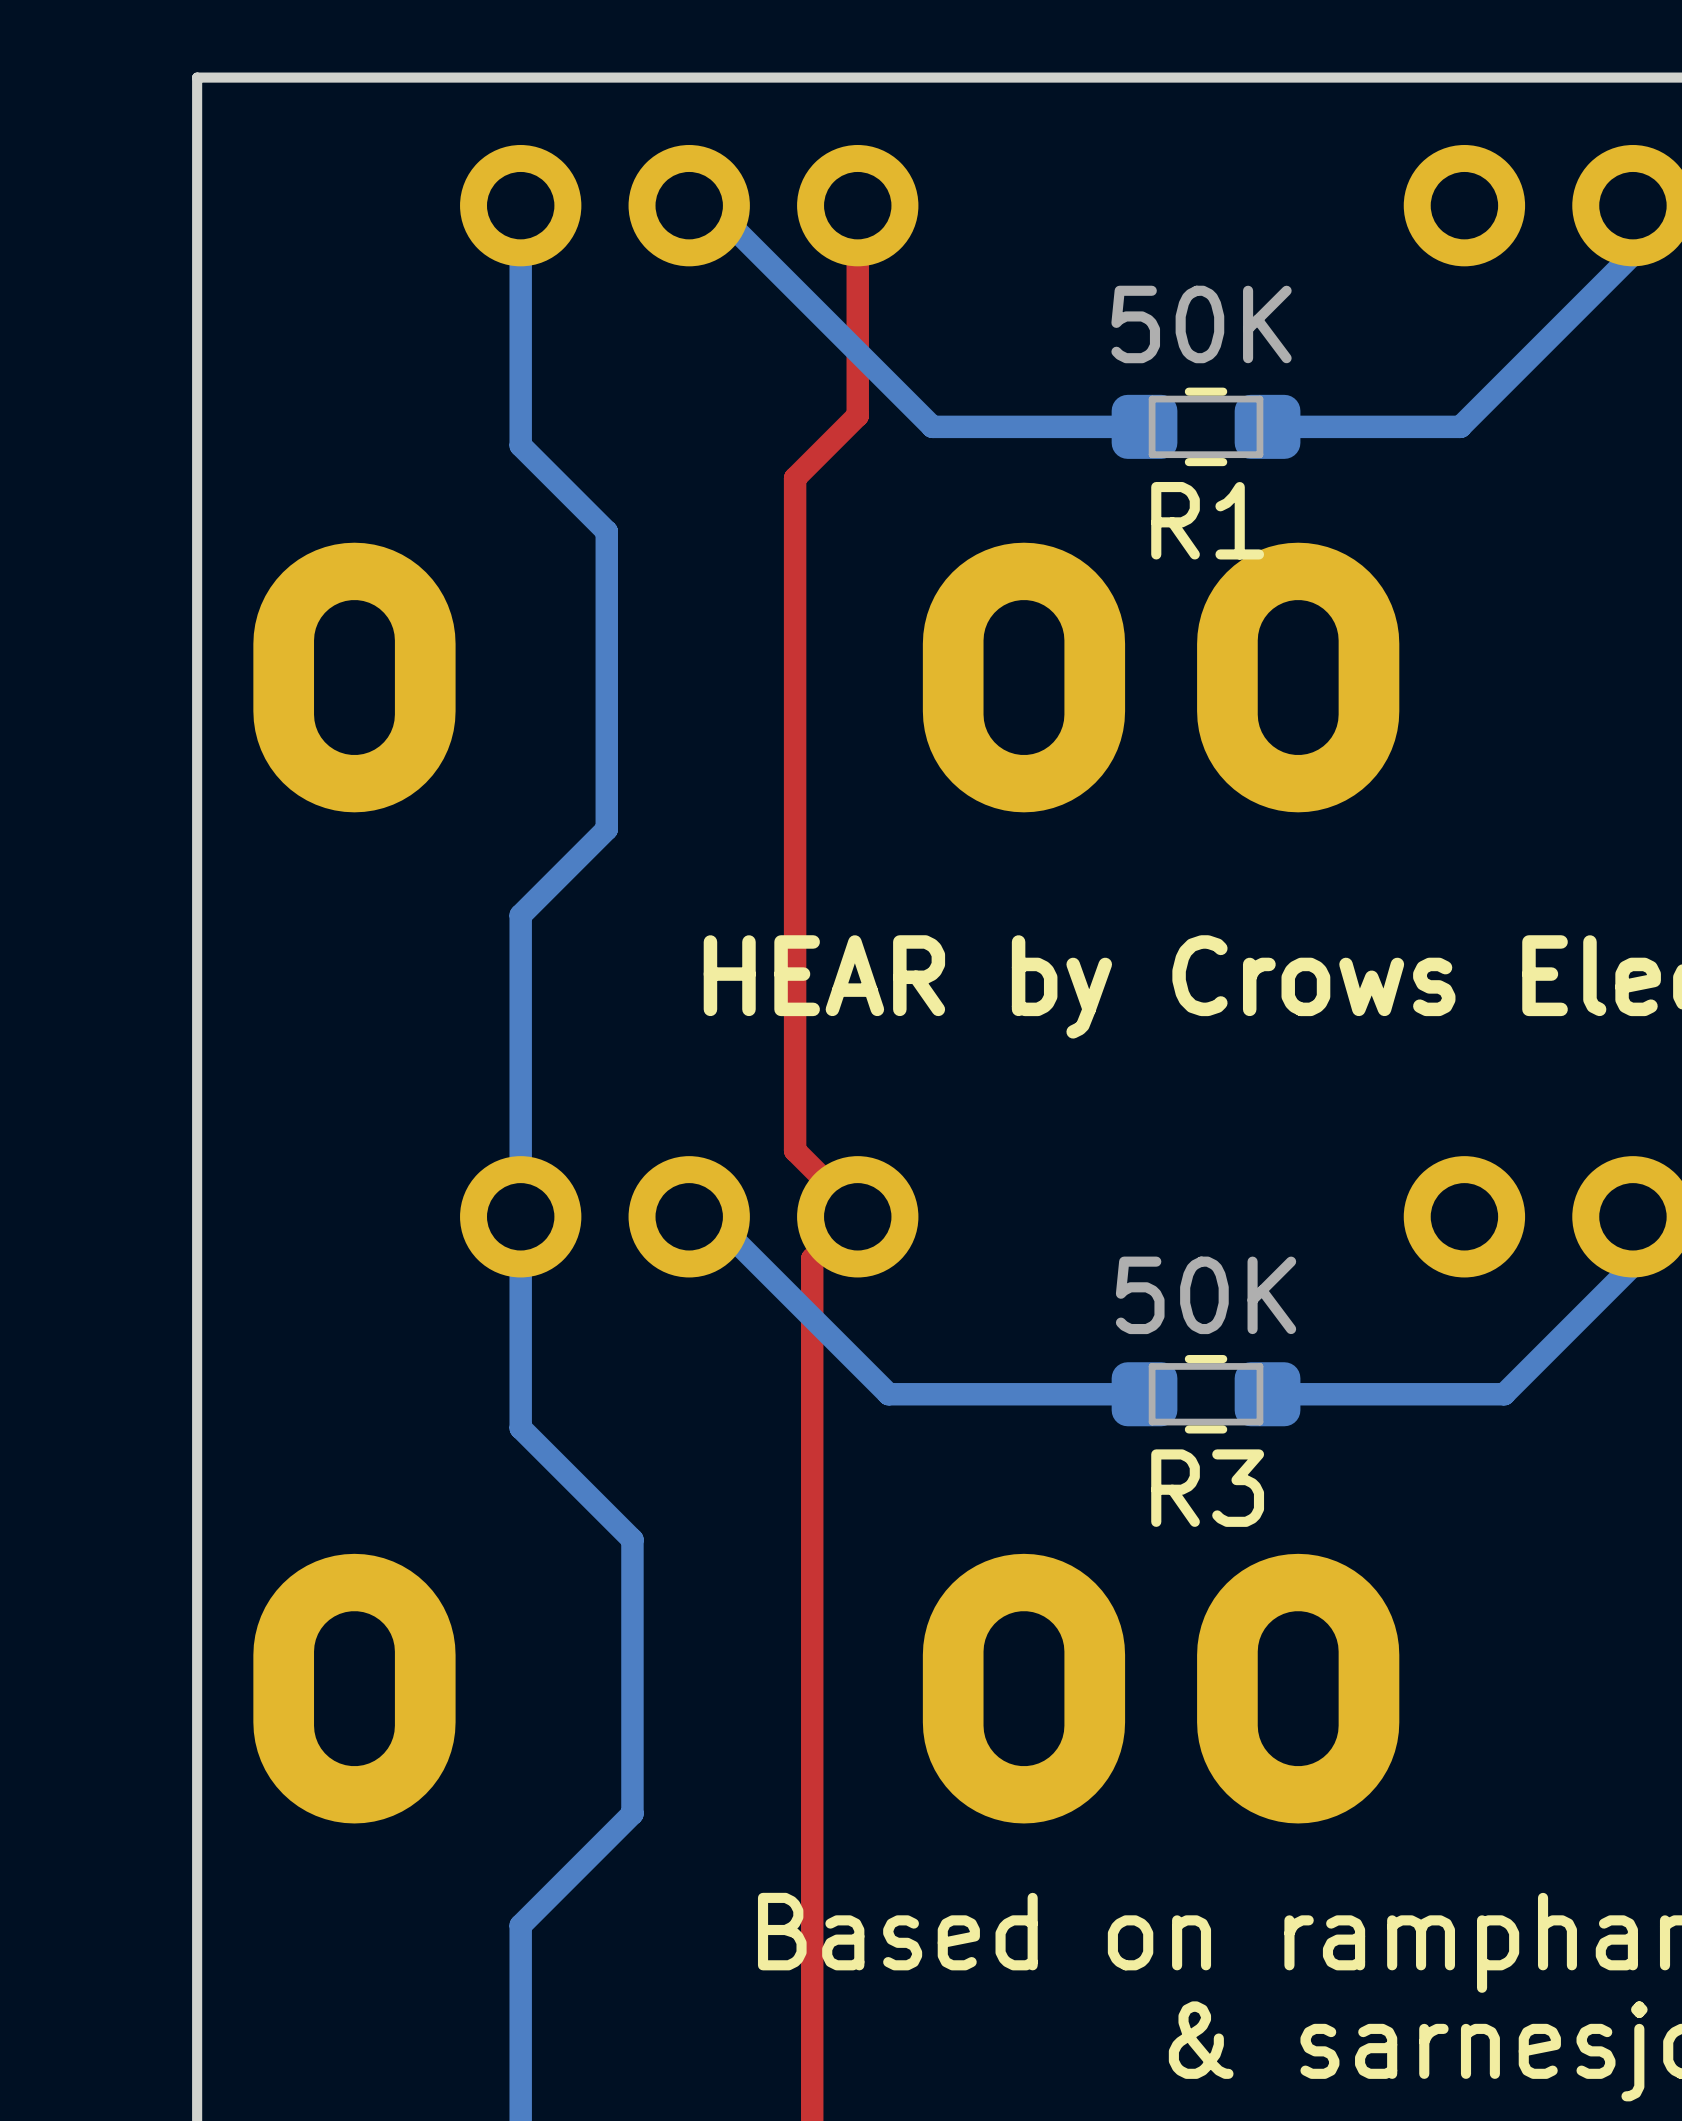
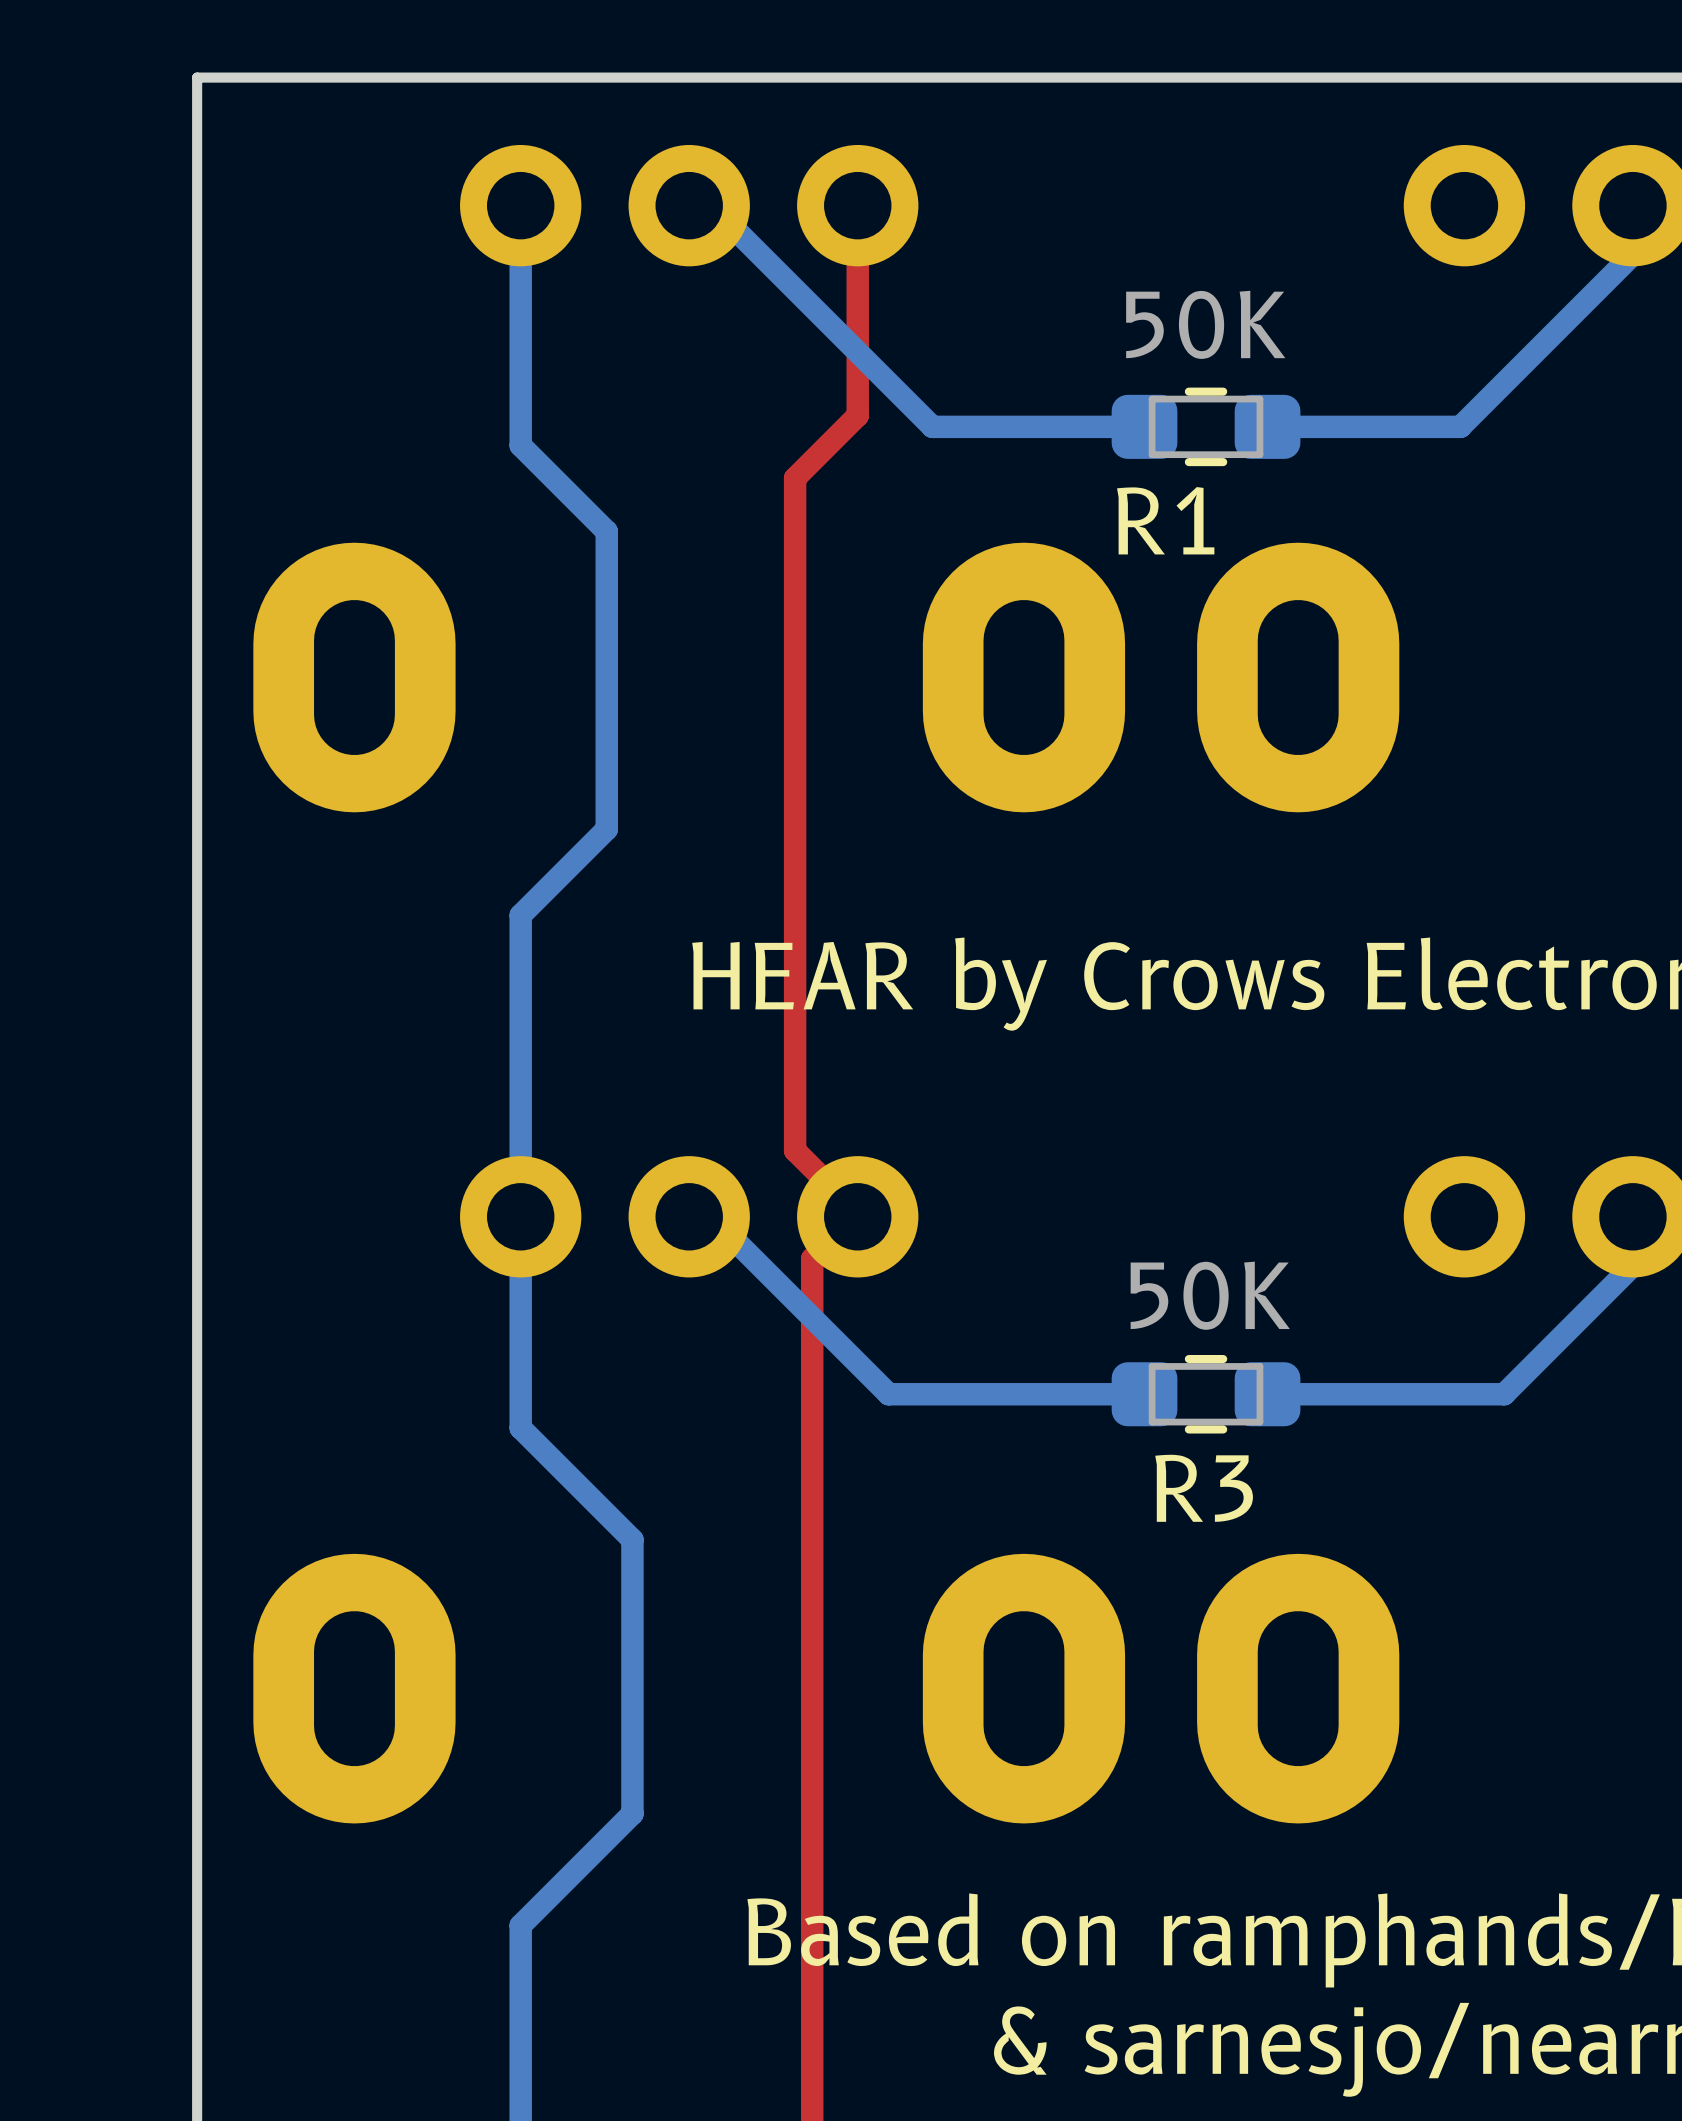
R1 name position: R1 (1207, 520) -> R1 (1165, 520)

